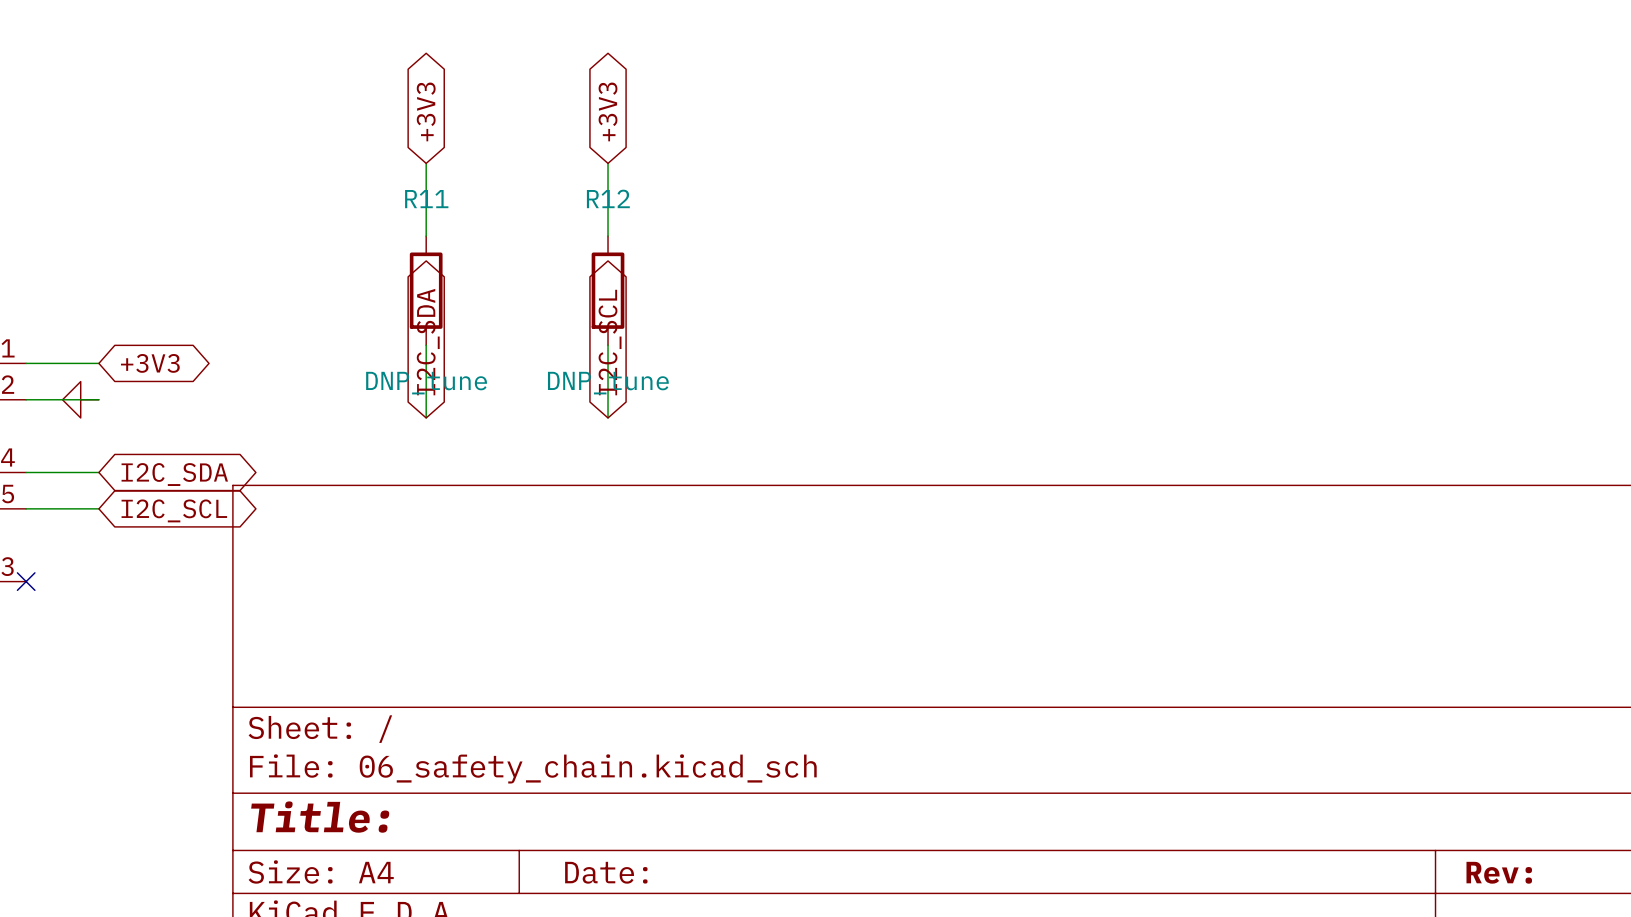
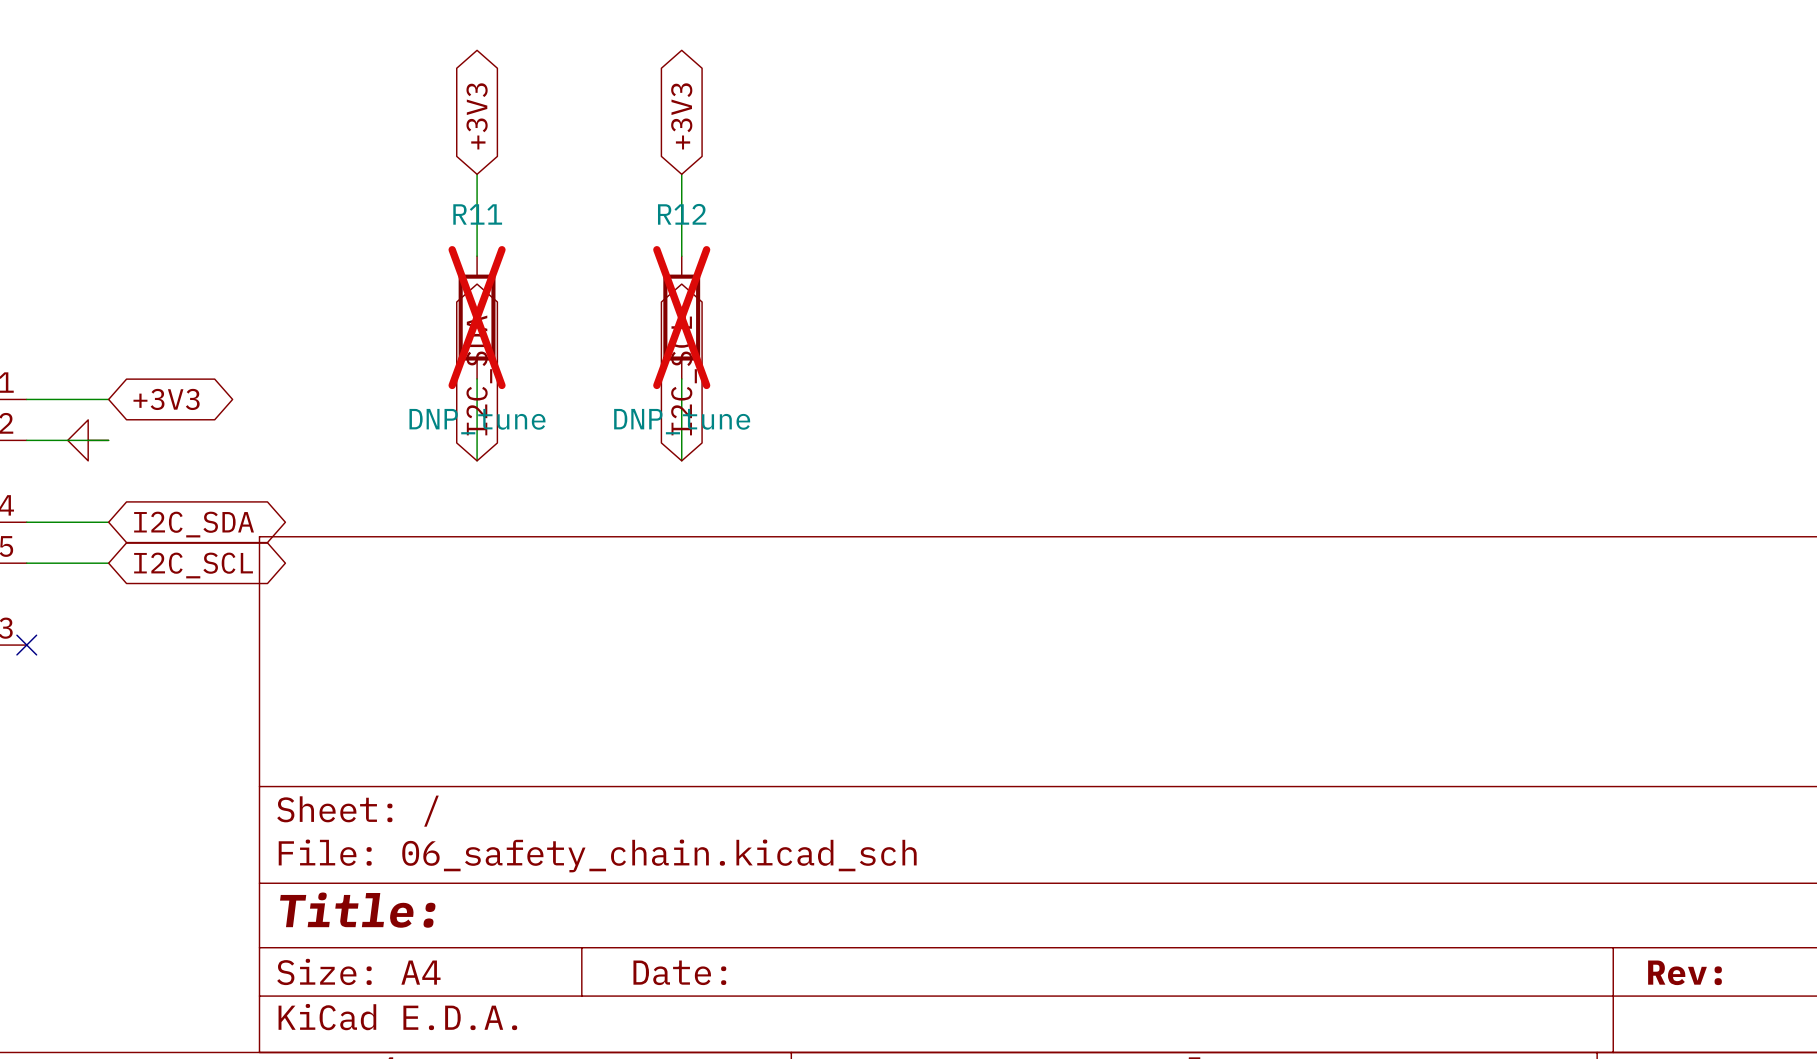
R11 do-not-place cross: none -> (477, 317)
R12 do-not-place cross: none -> (681, 317)

